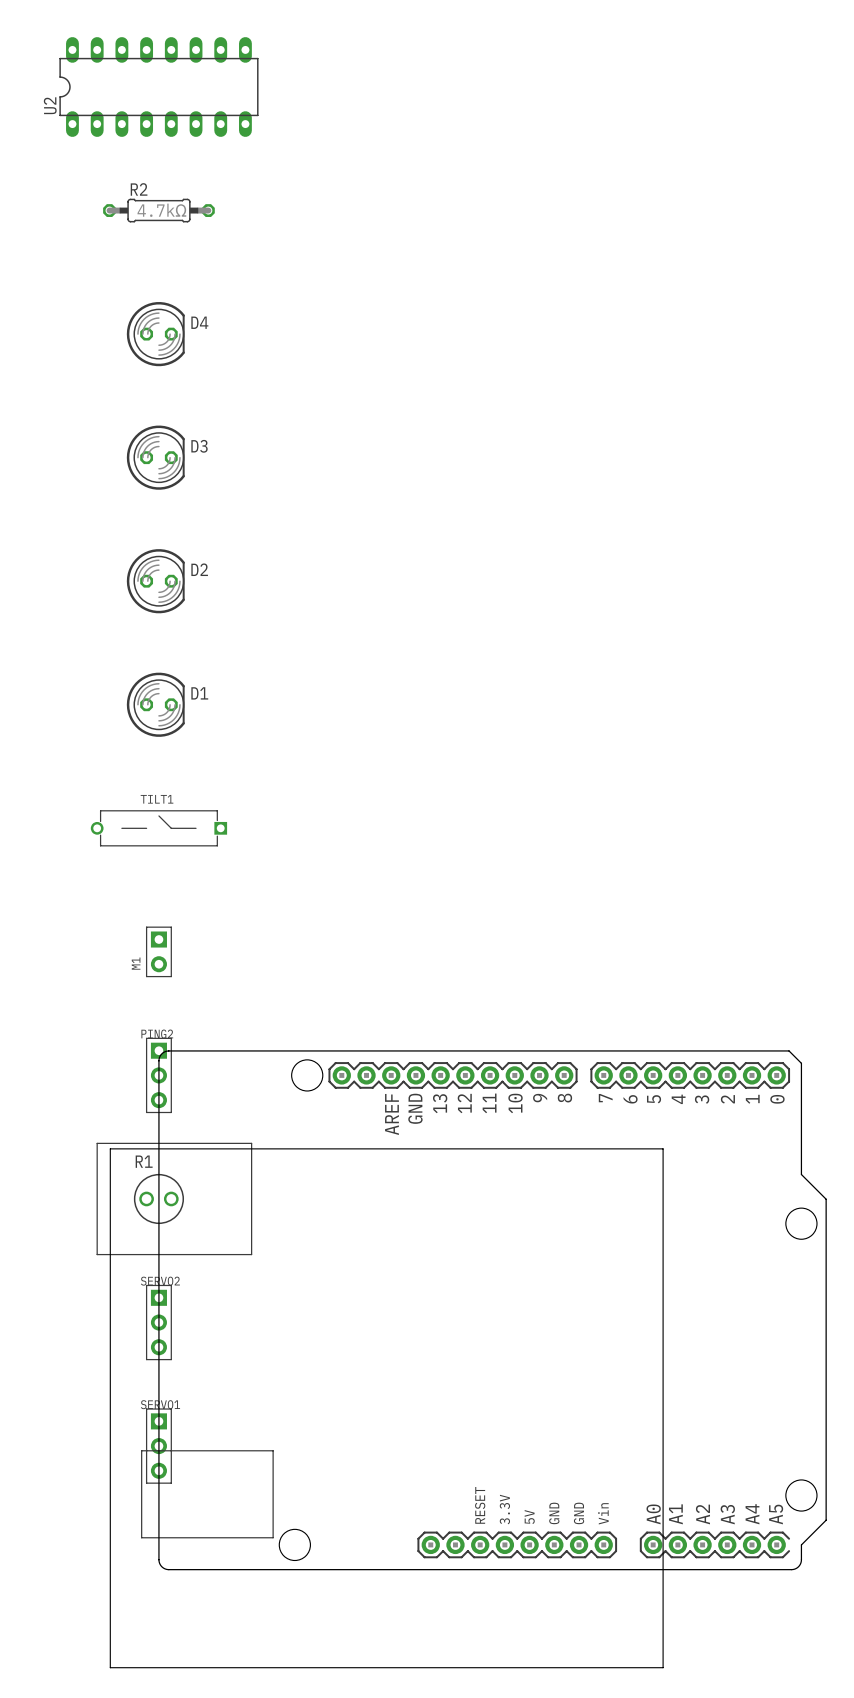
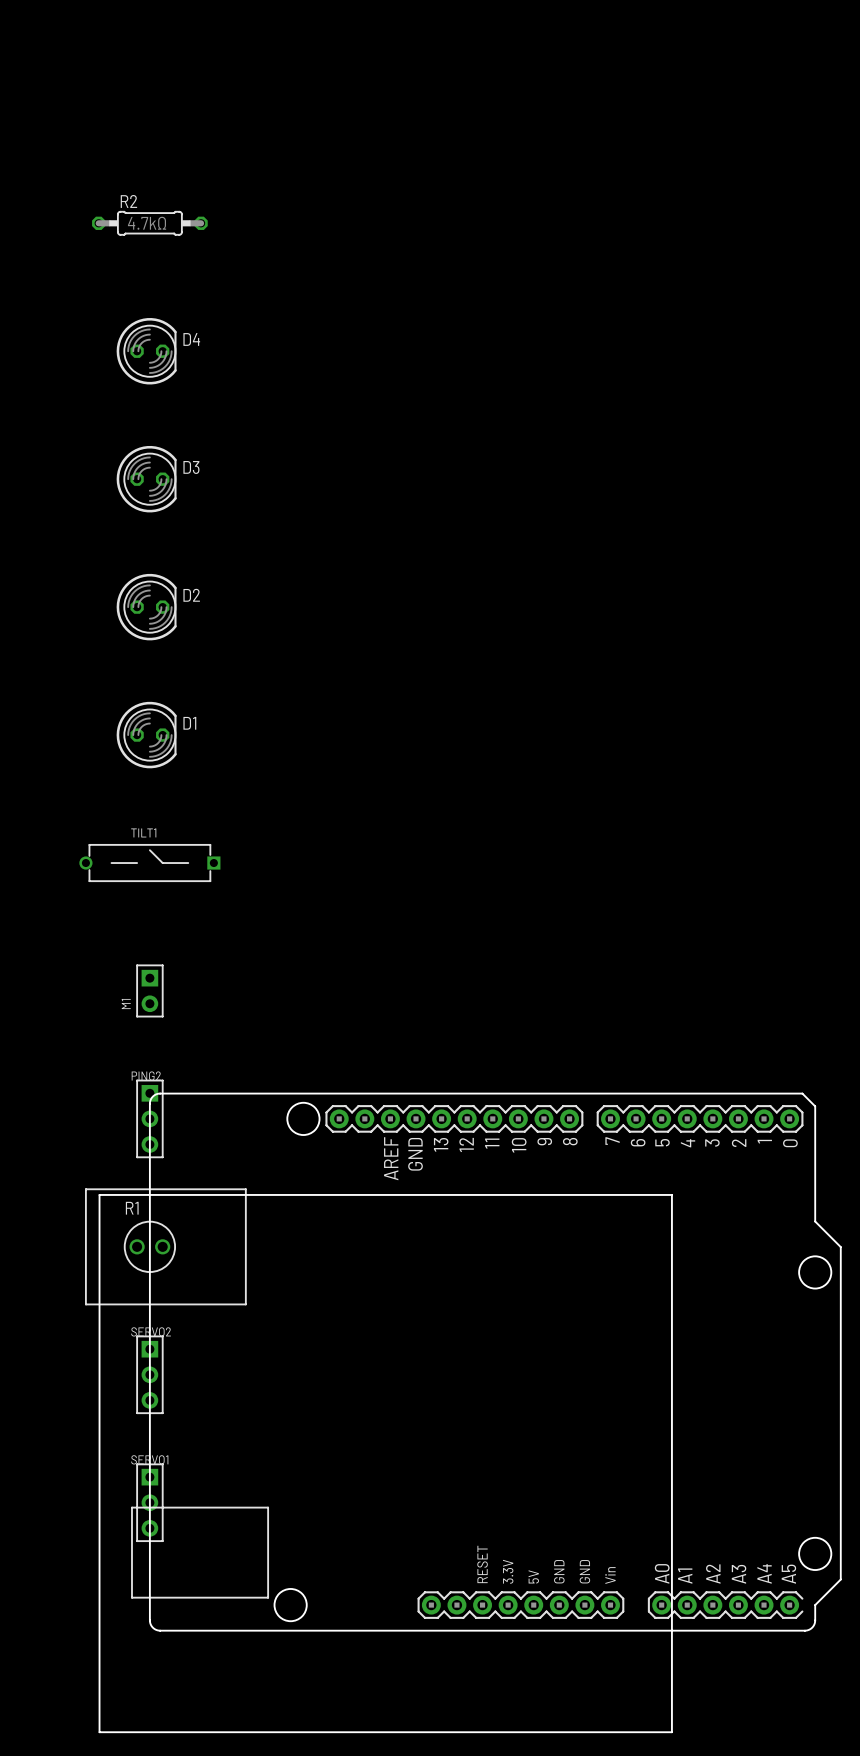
U2: (158, 87) -> none

